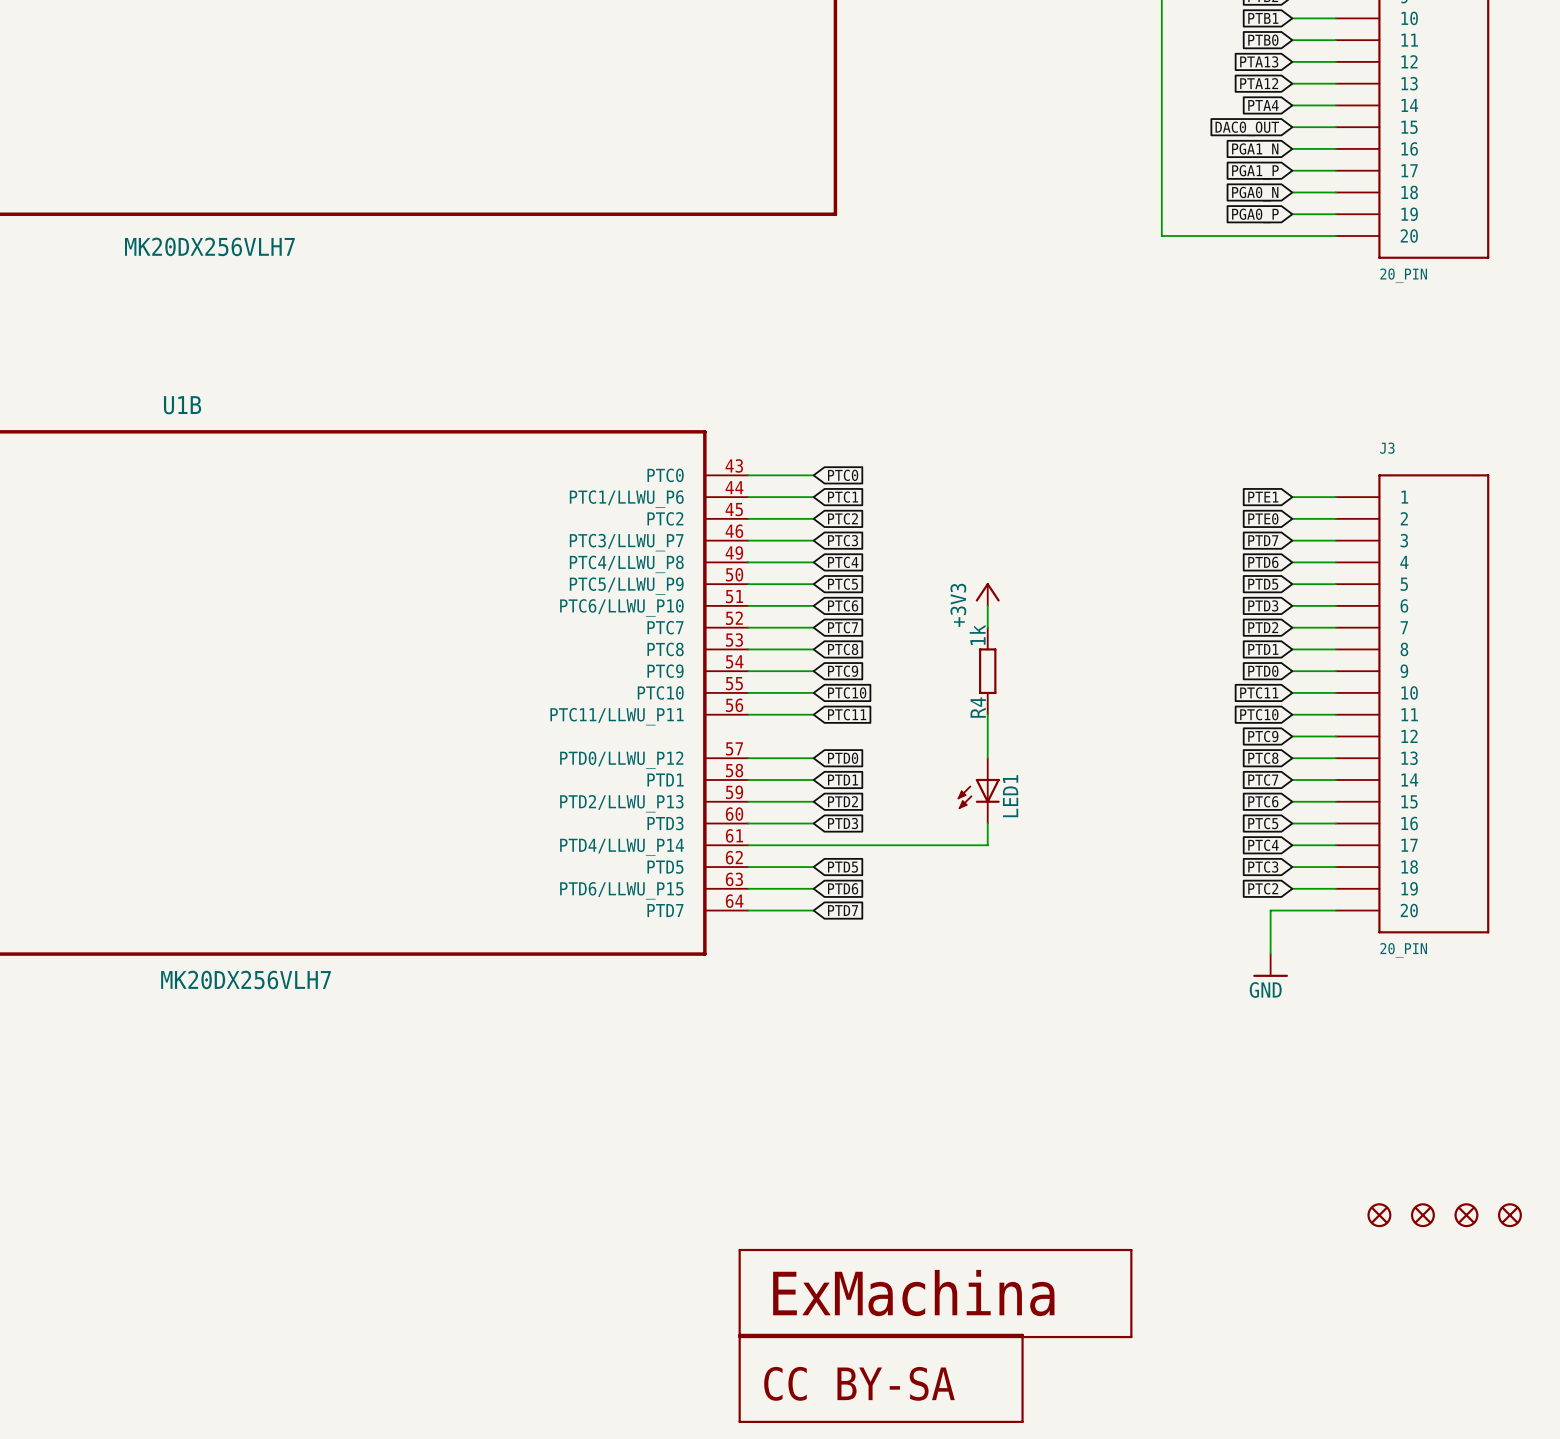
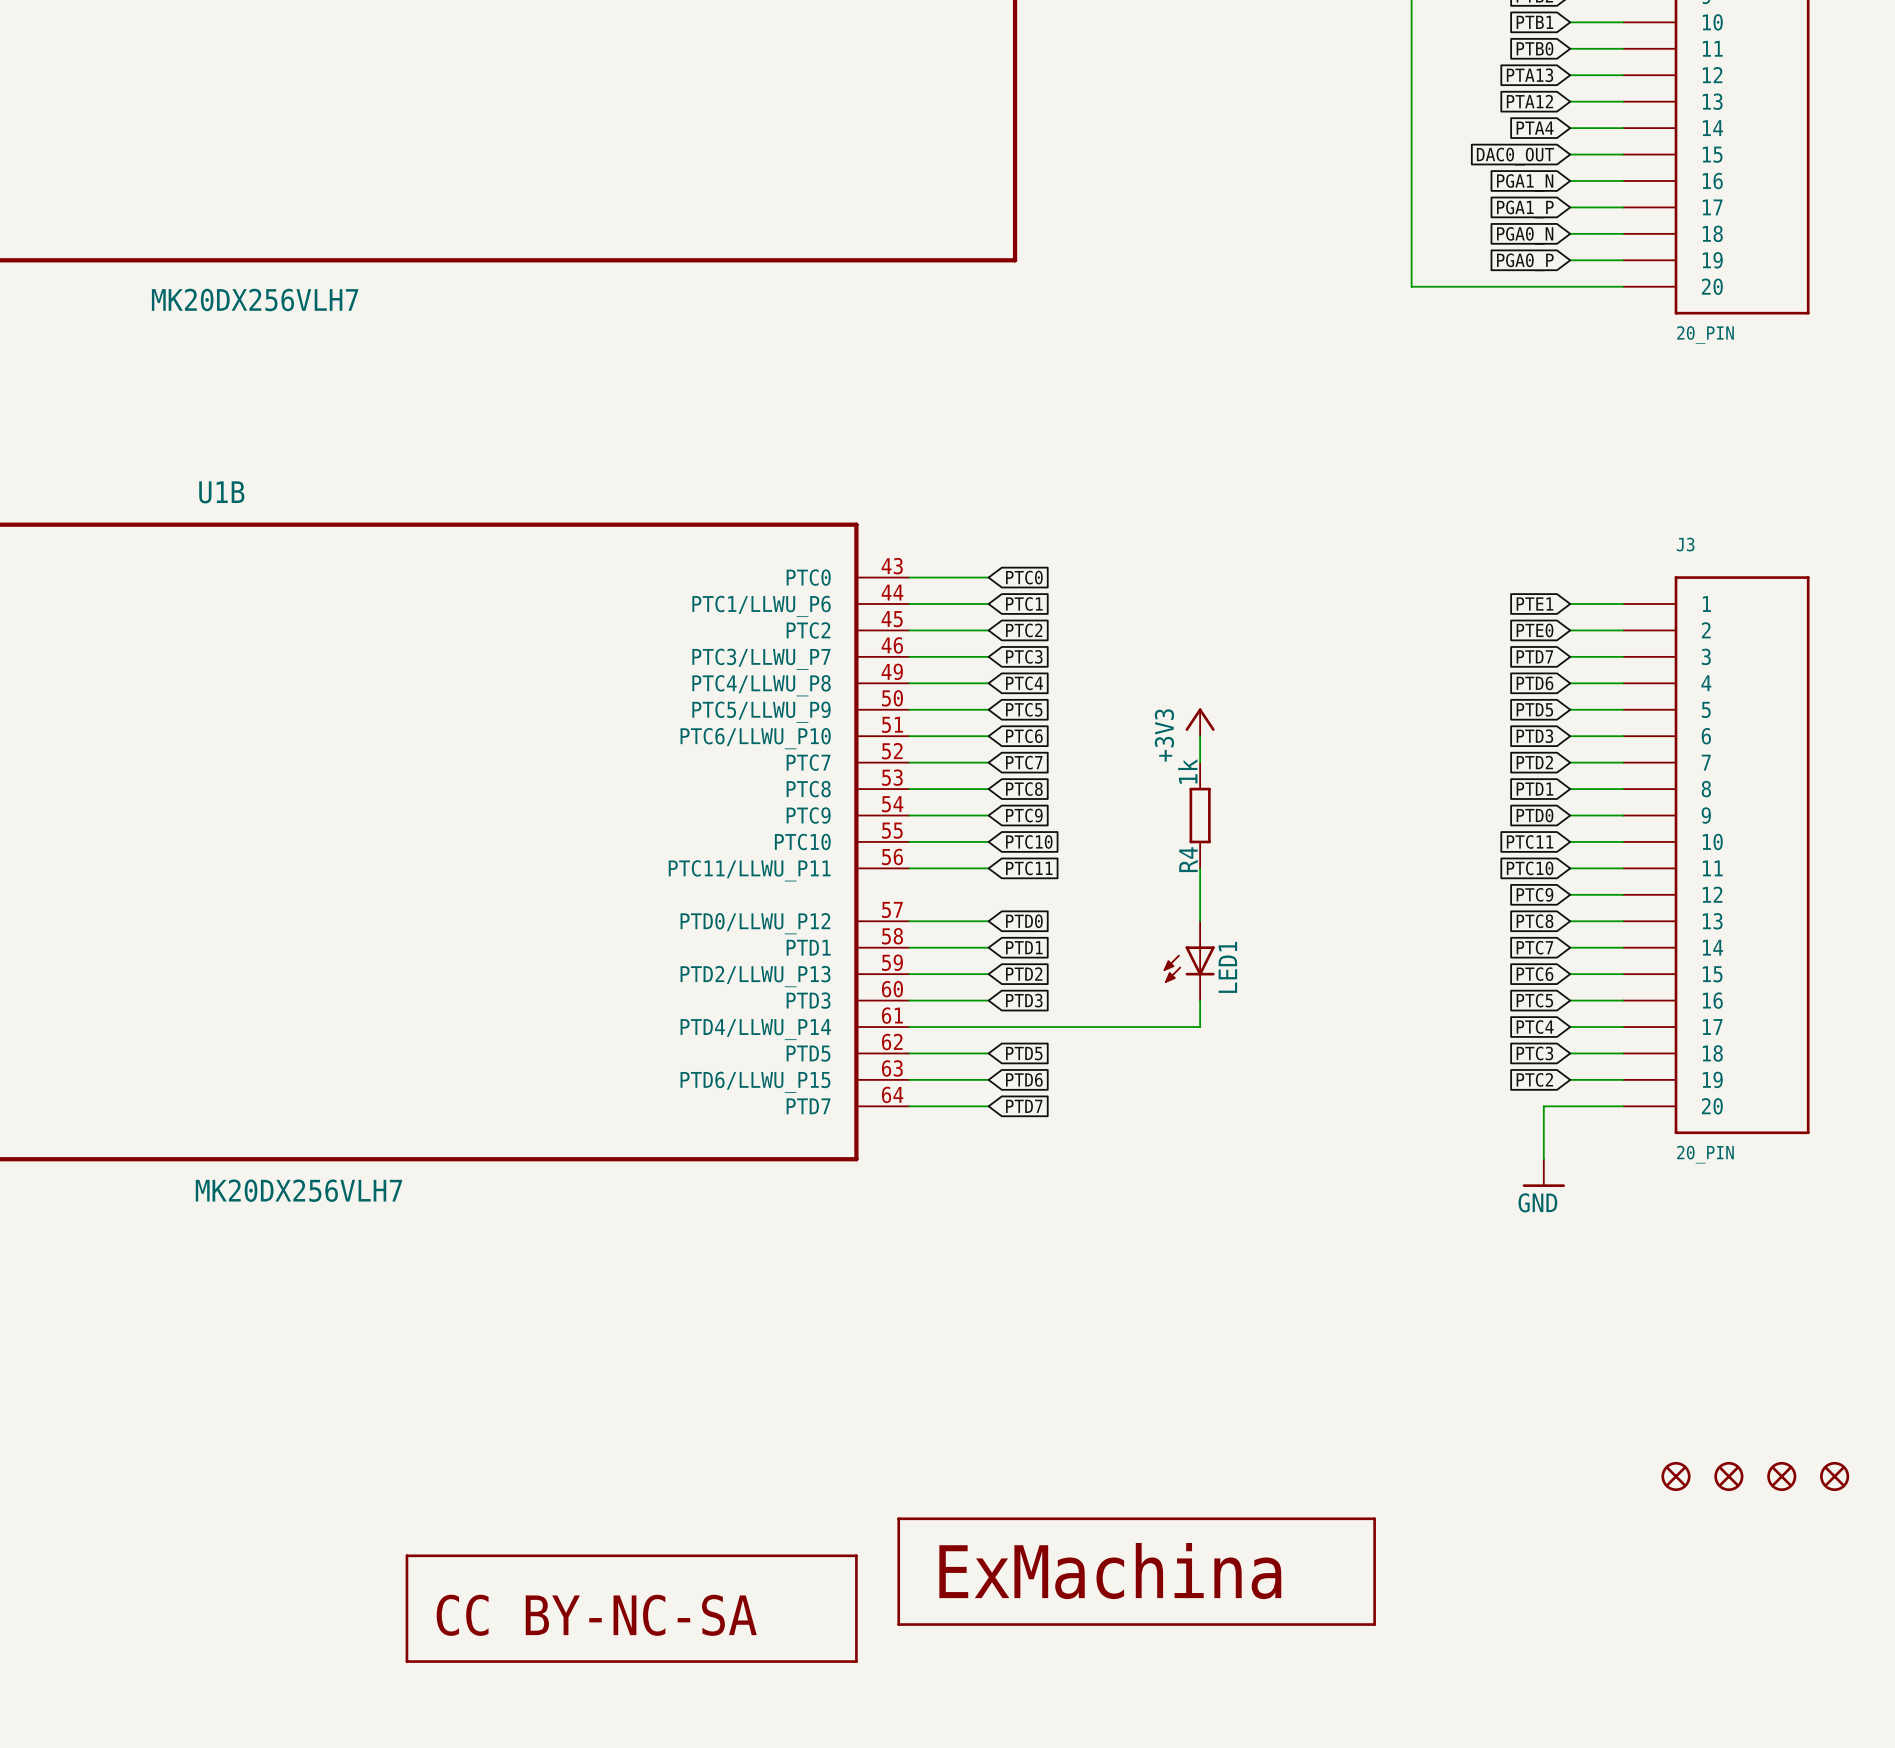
part: none -> (631, 1608)
part: (881, 1378) -> none

